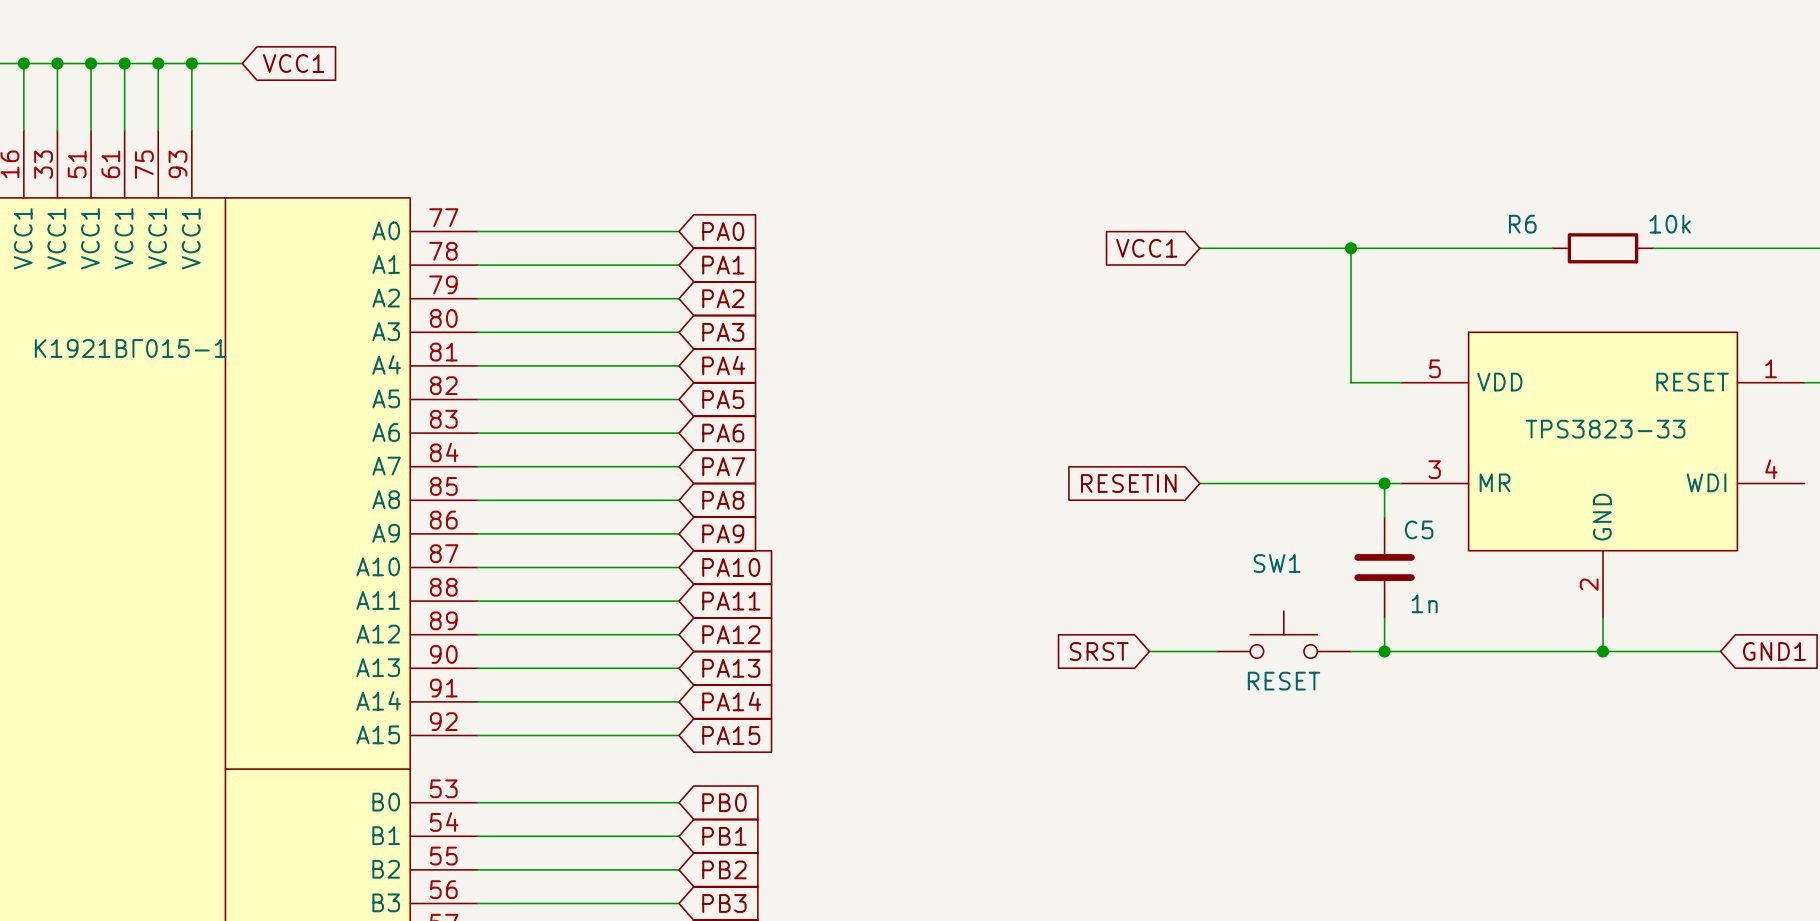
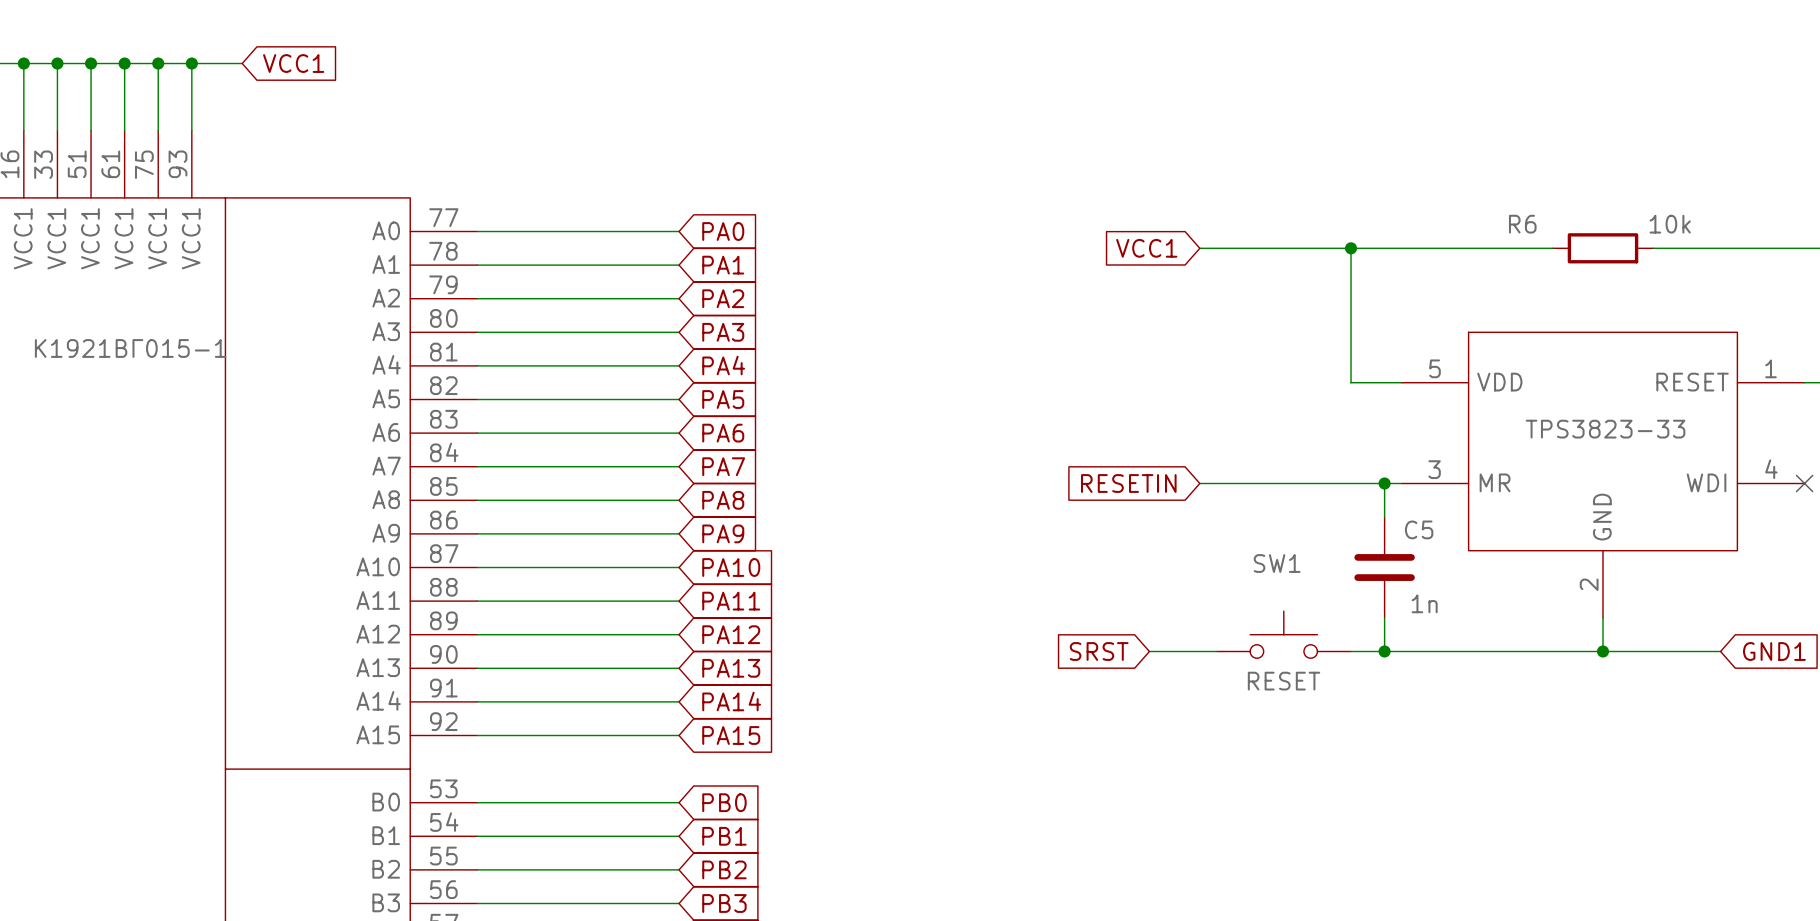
no-connect mark: none -> (1804, 483)

